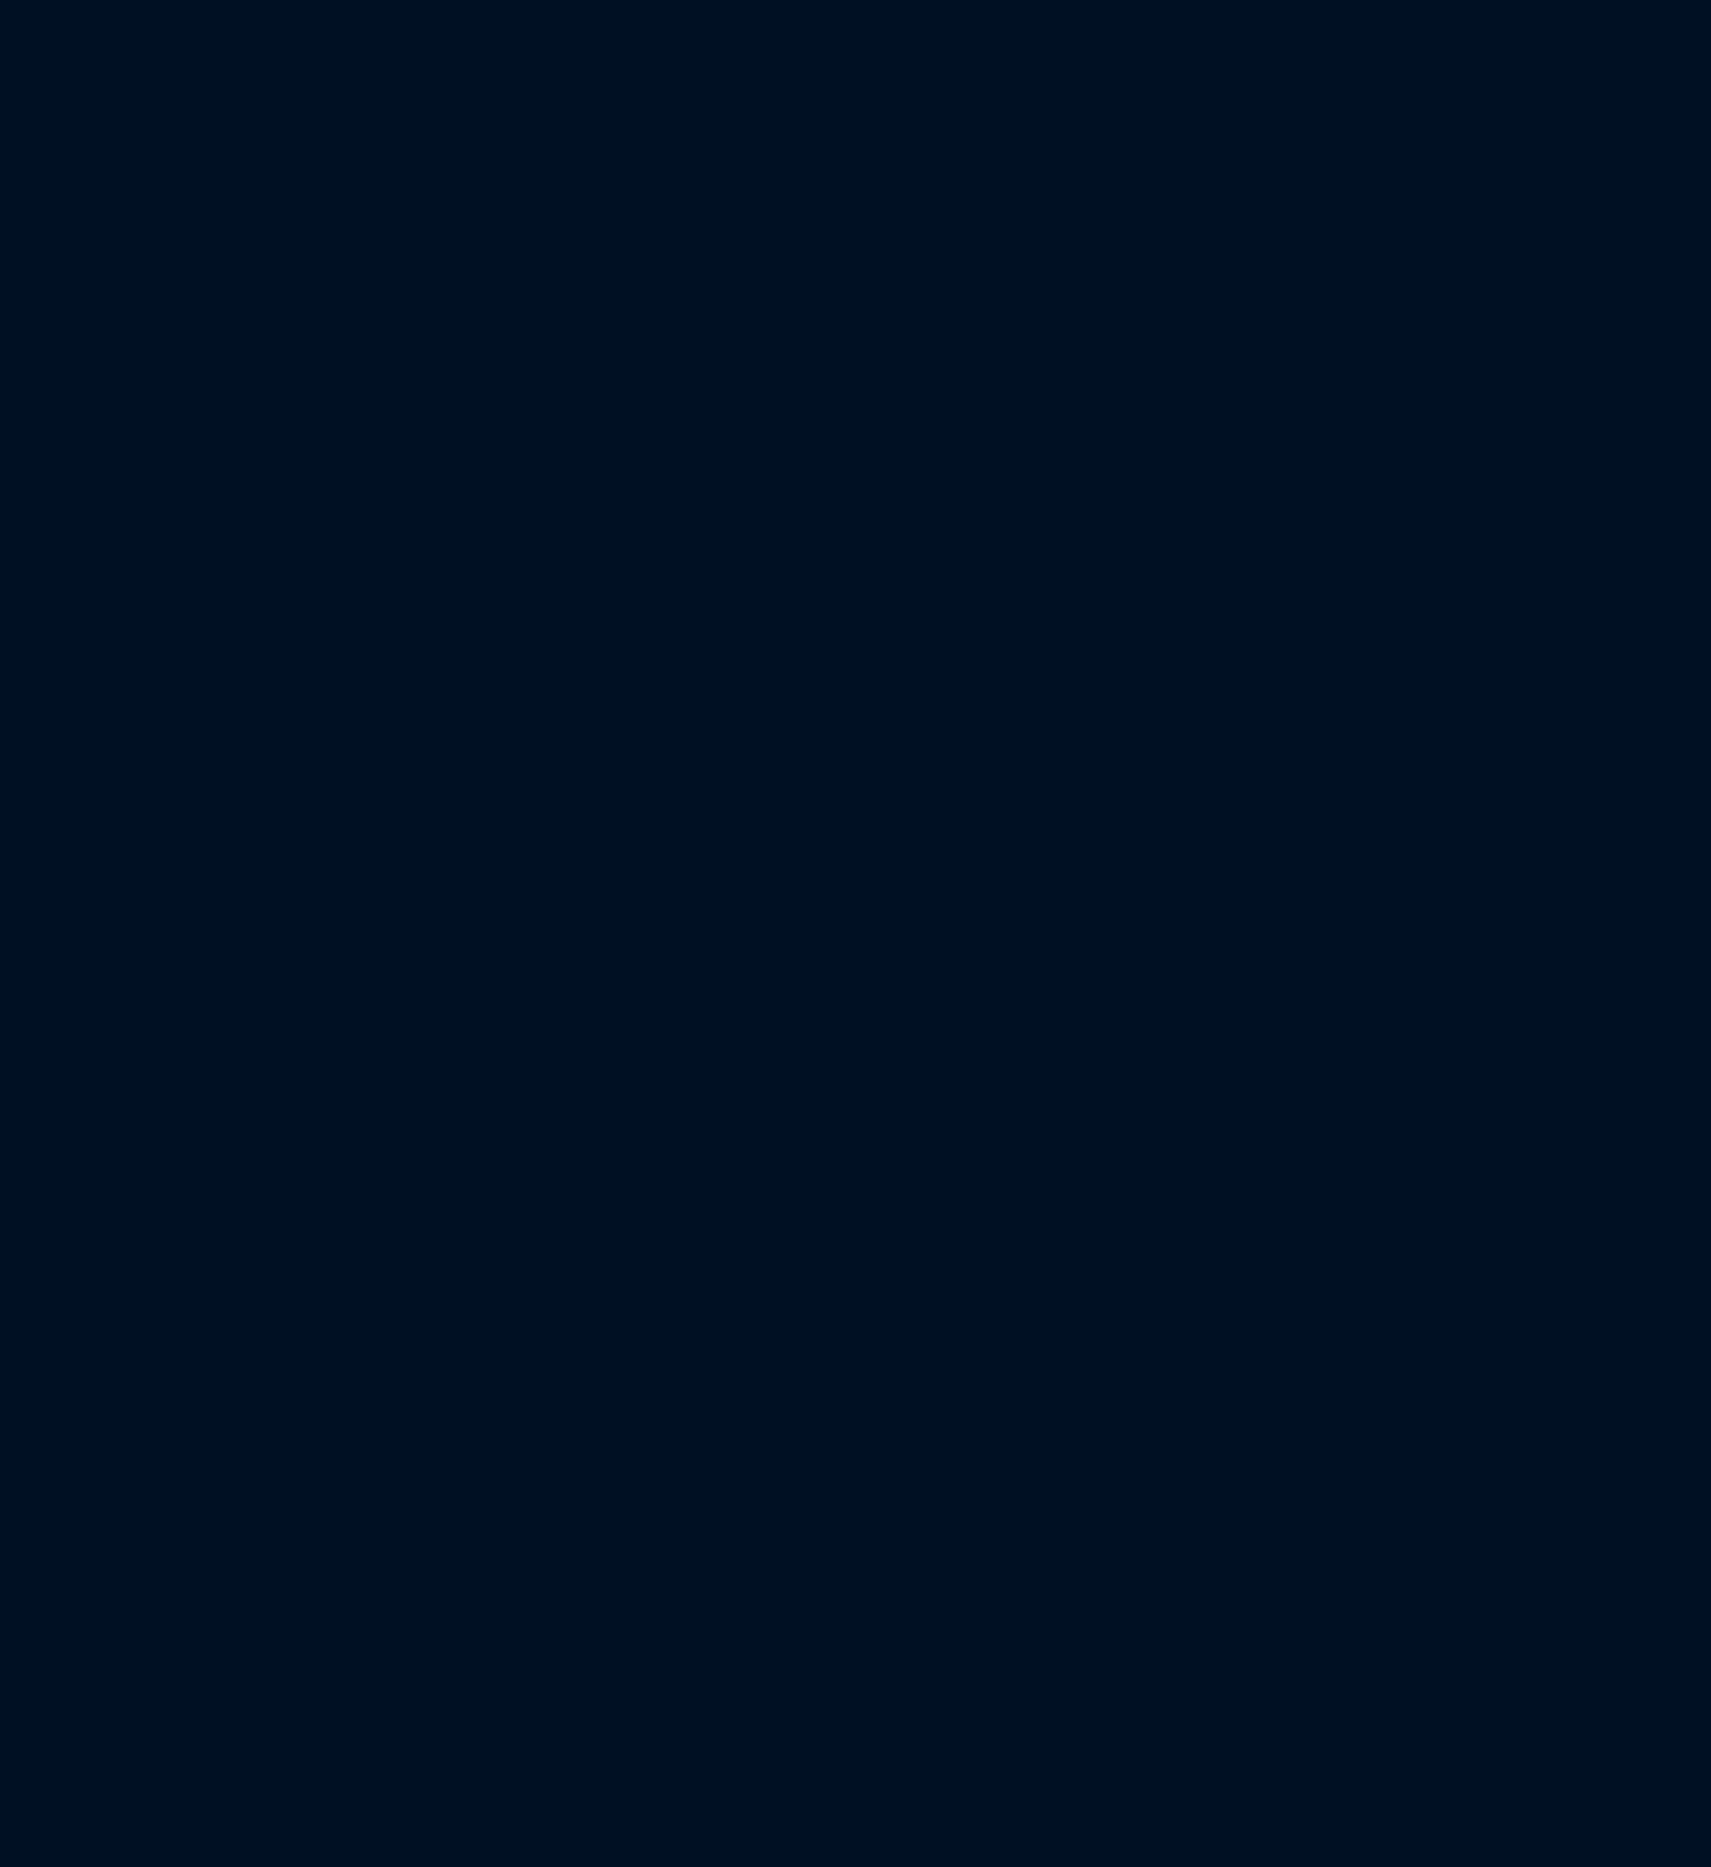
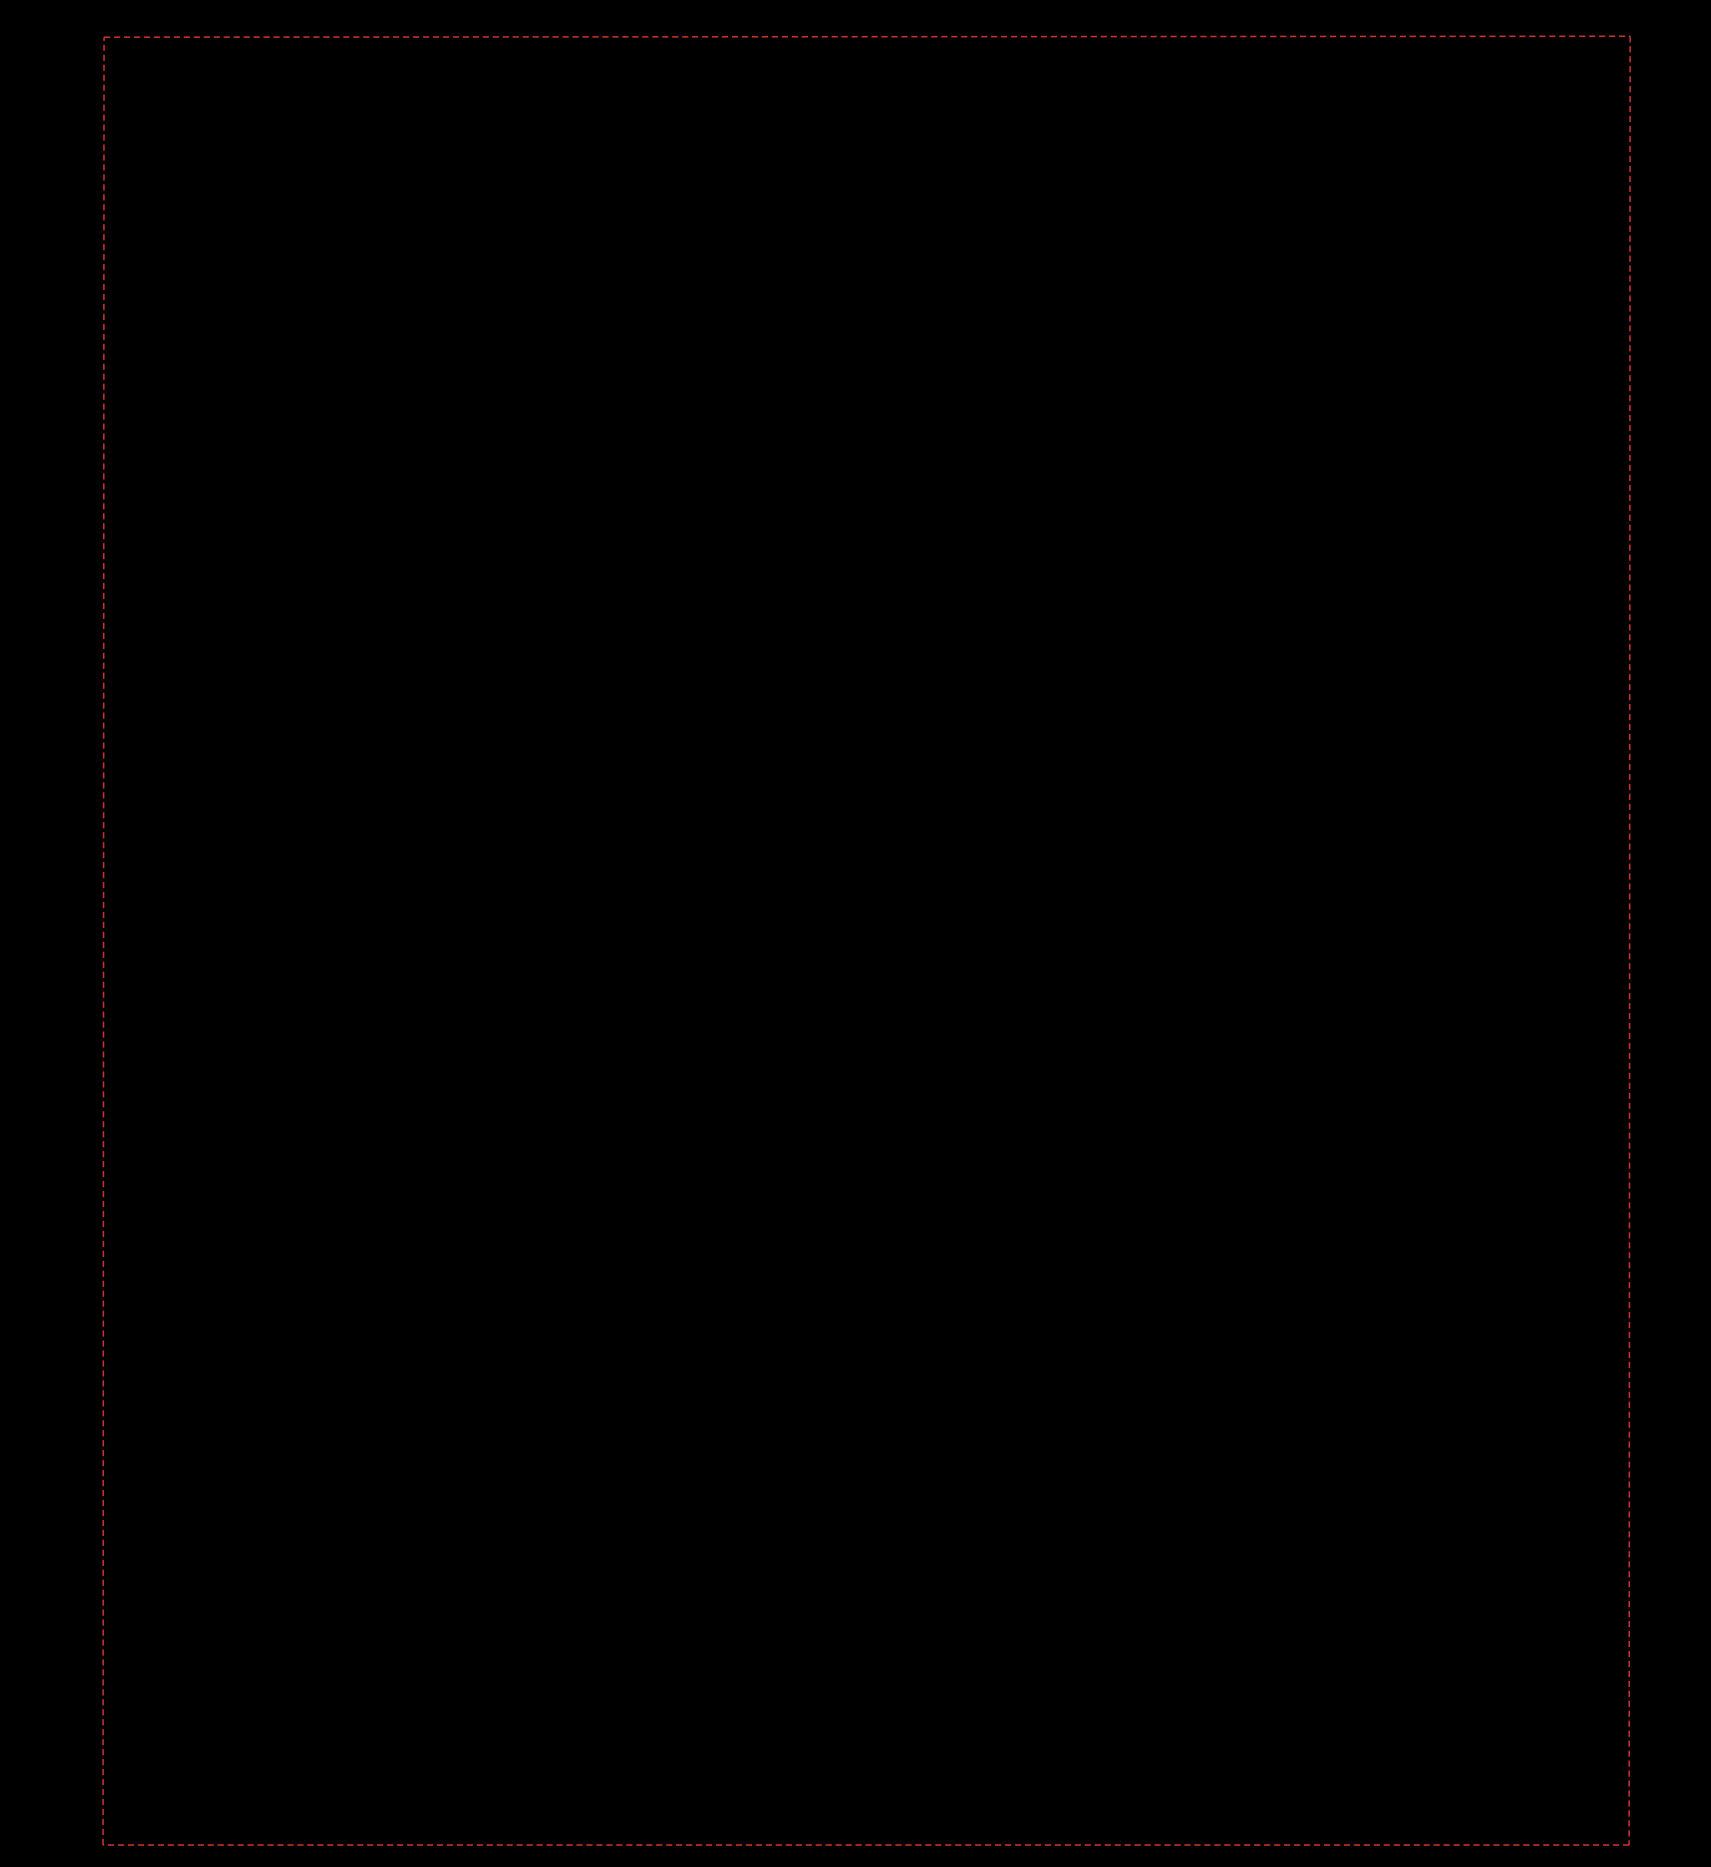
zone outline: none -> (1630, 36) (104, 37) (103, 1845) (1629, 1845) (1630, 36)

